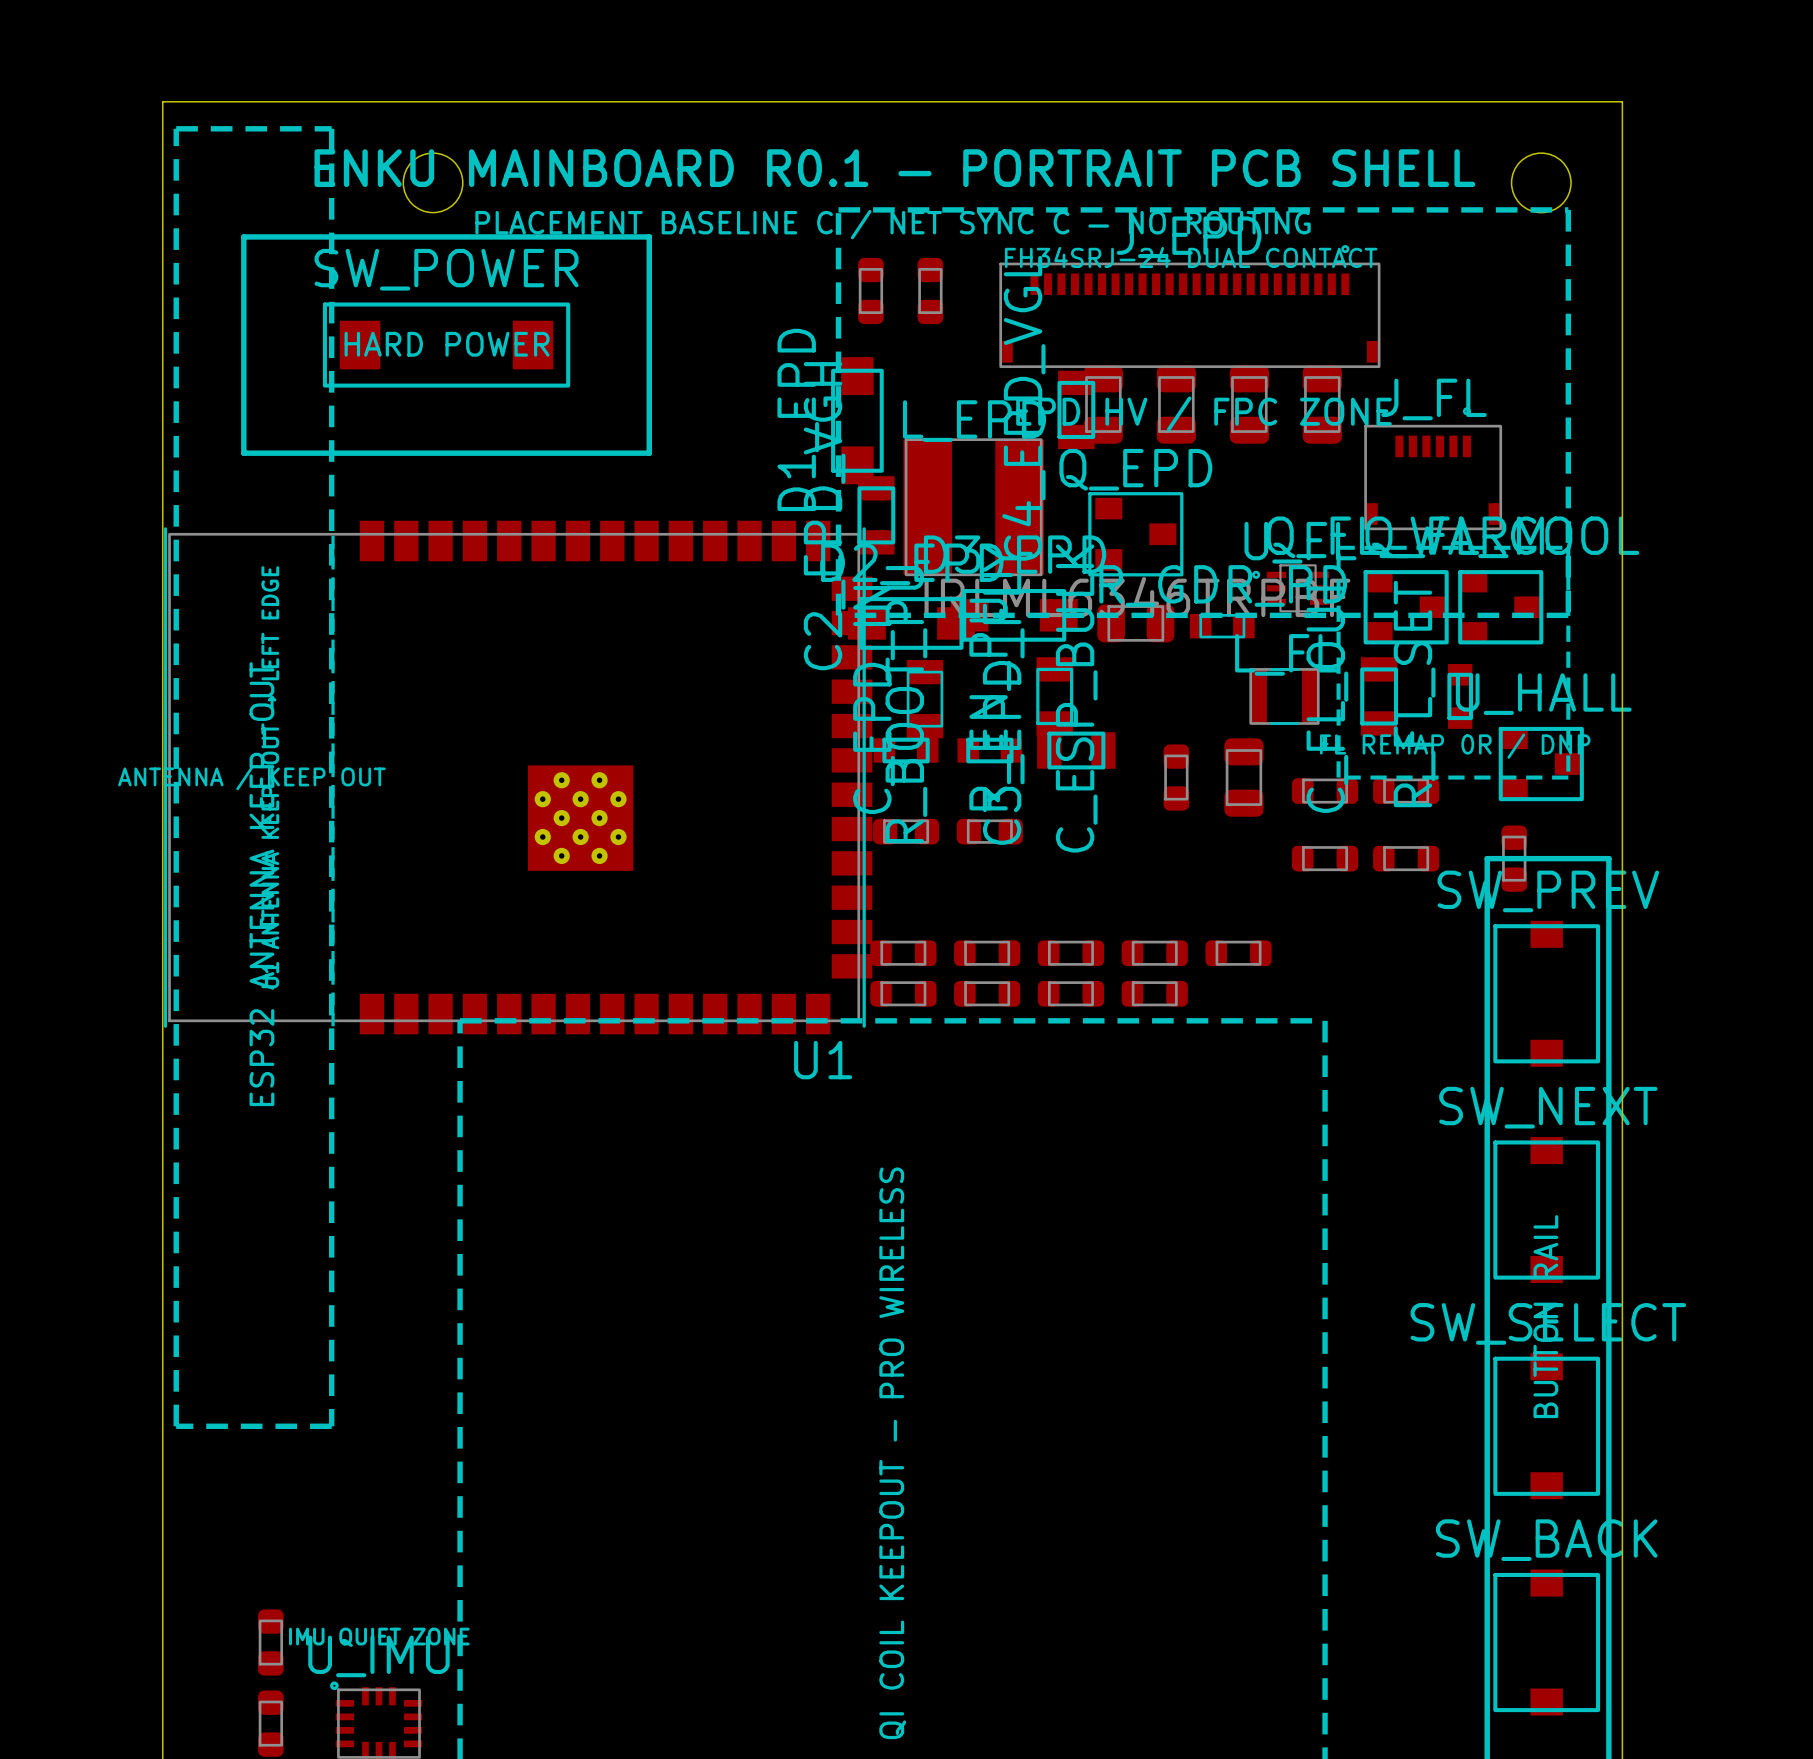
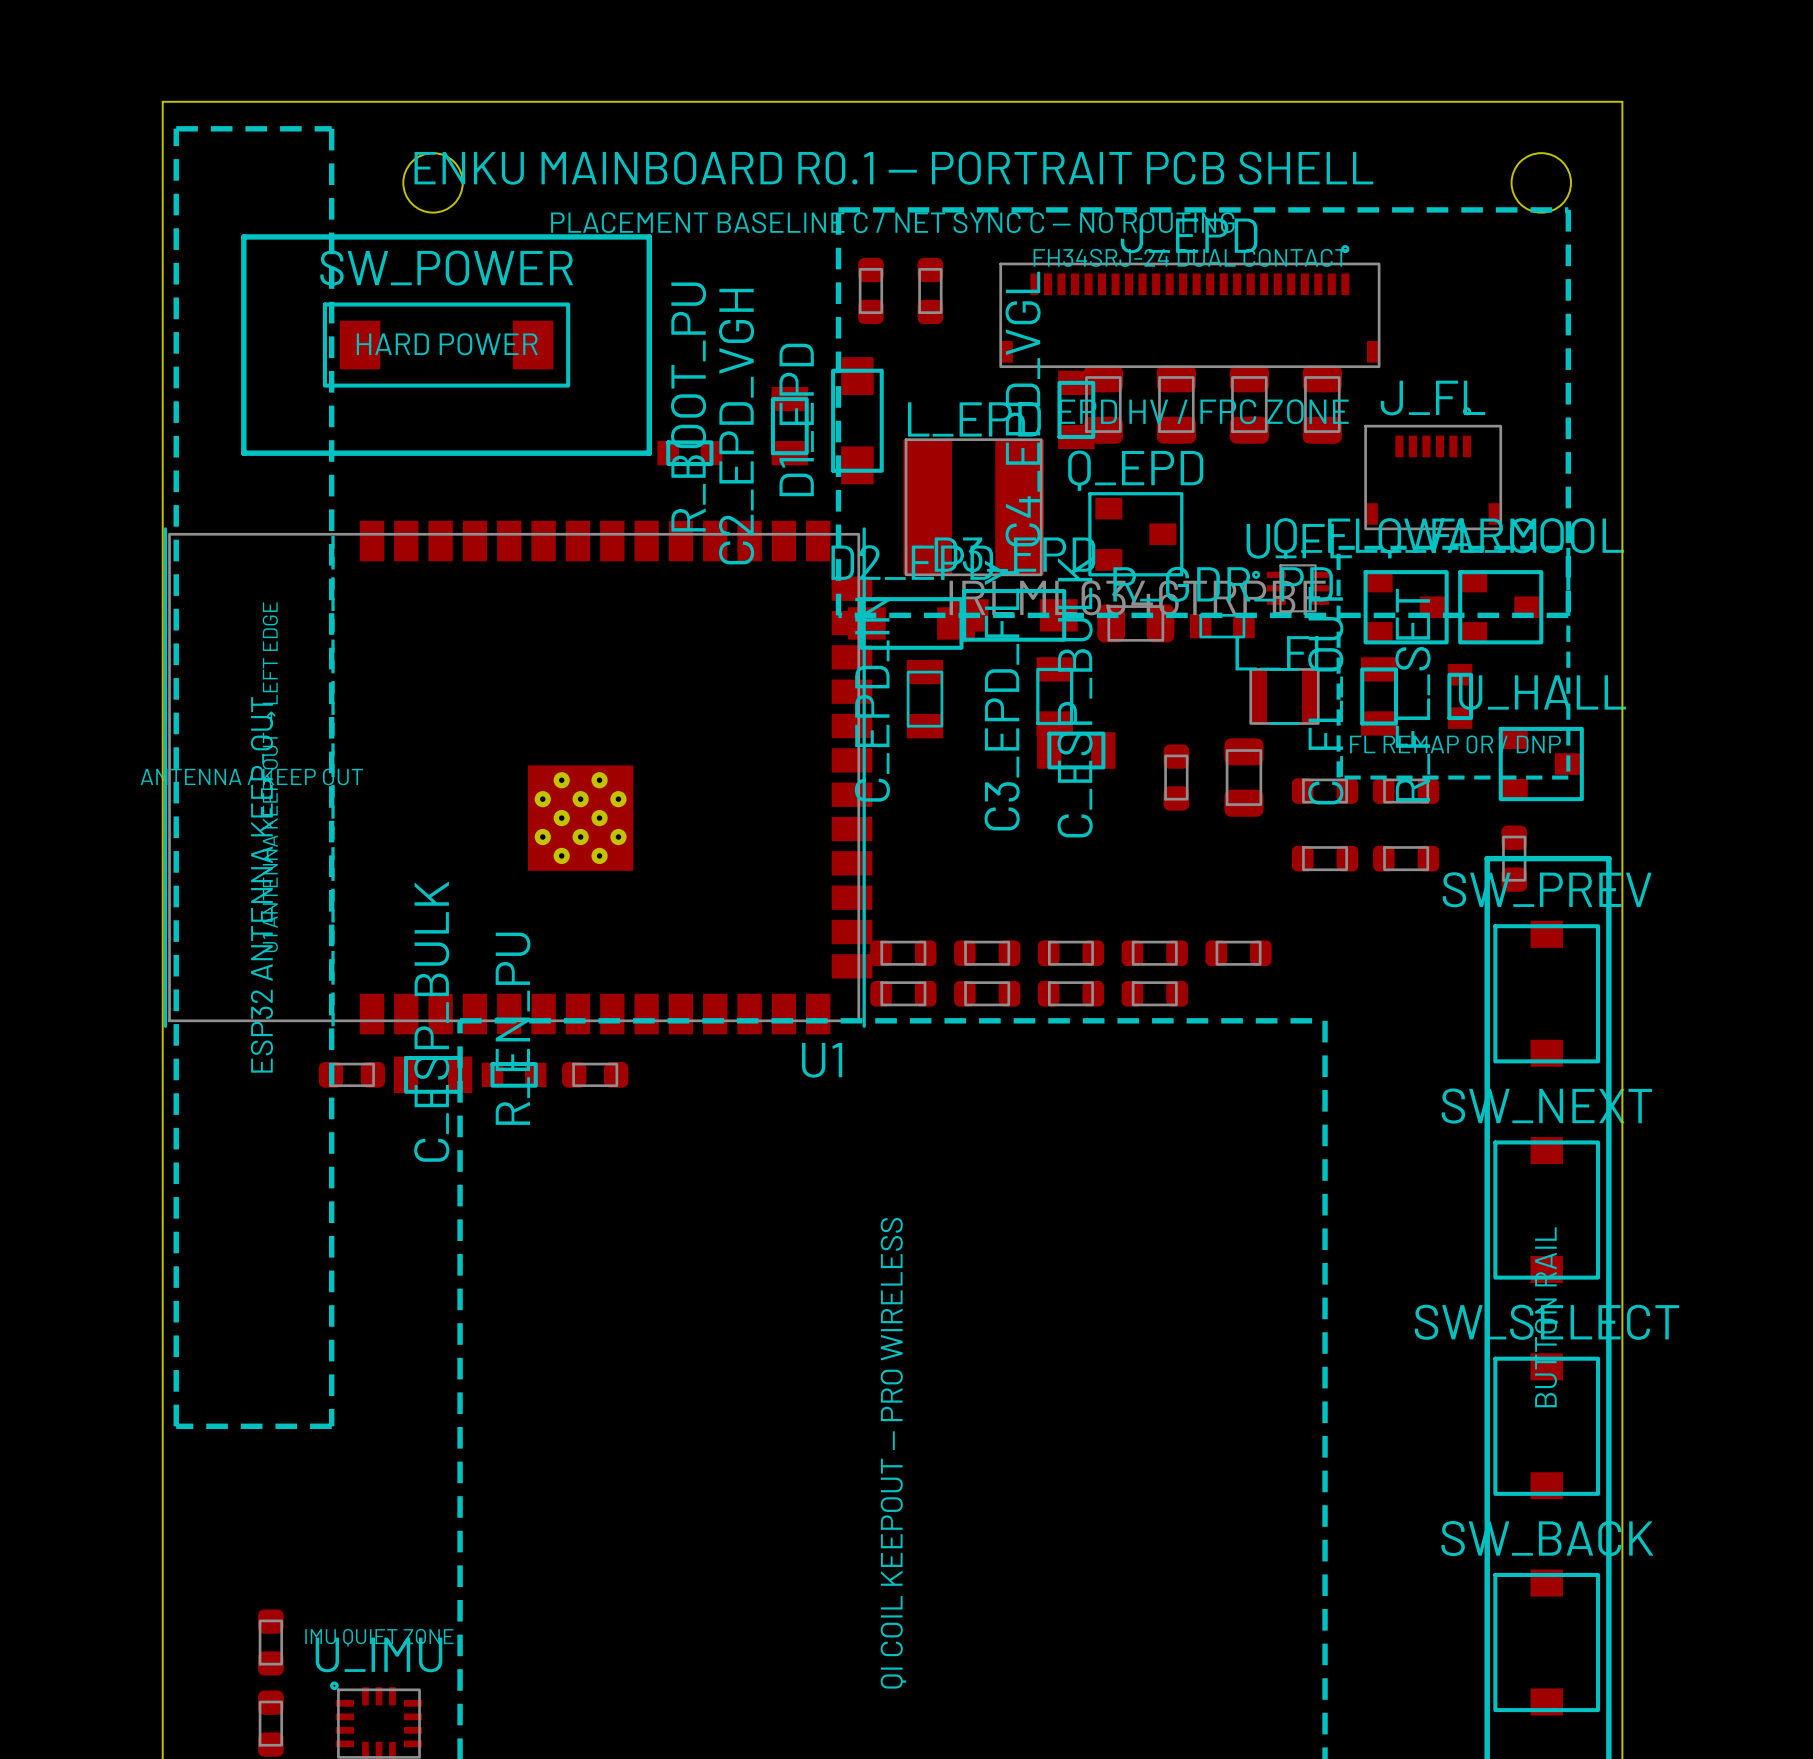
C2_EPD_VGH position: (876, 515) -> (789, 426)
R_BOOT_PU position: (906, 750) -> (689, 453)
R_EN_PU position: (989, 750) -> (514, 1074)
part: (906, 831) -> none
part: (989, 831) -> none
part: none -> (351, 1074)
C_ESP_BULK: none -> (433, 1074)
part: none -> (595, 1074)

